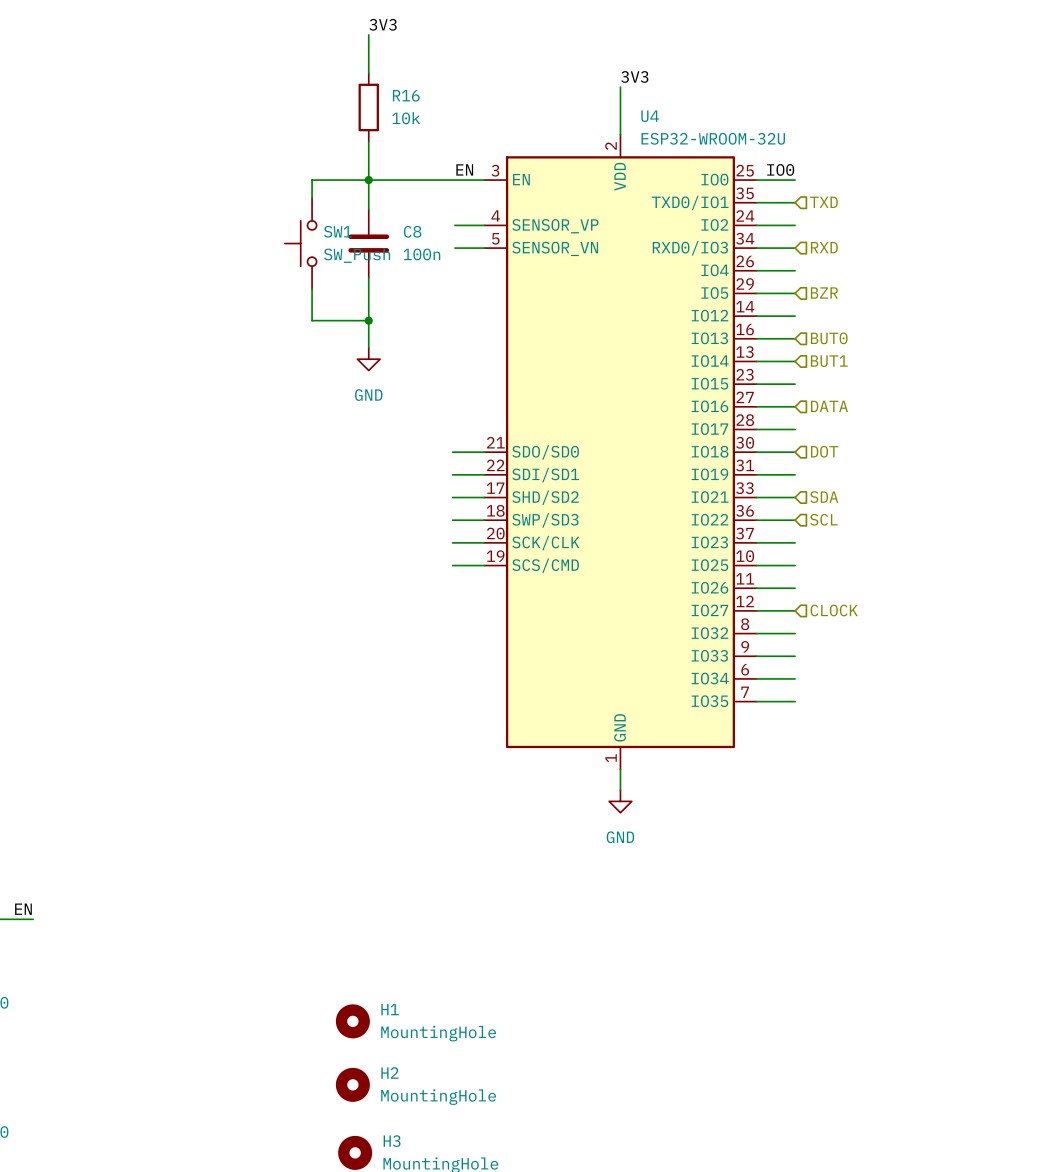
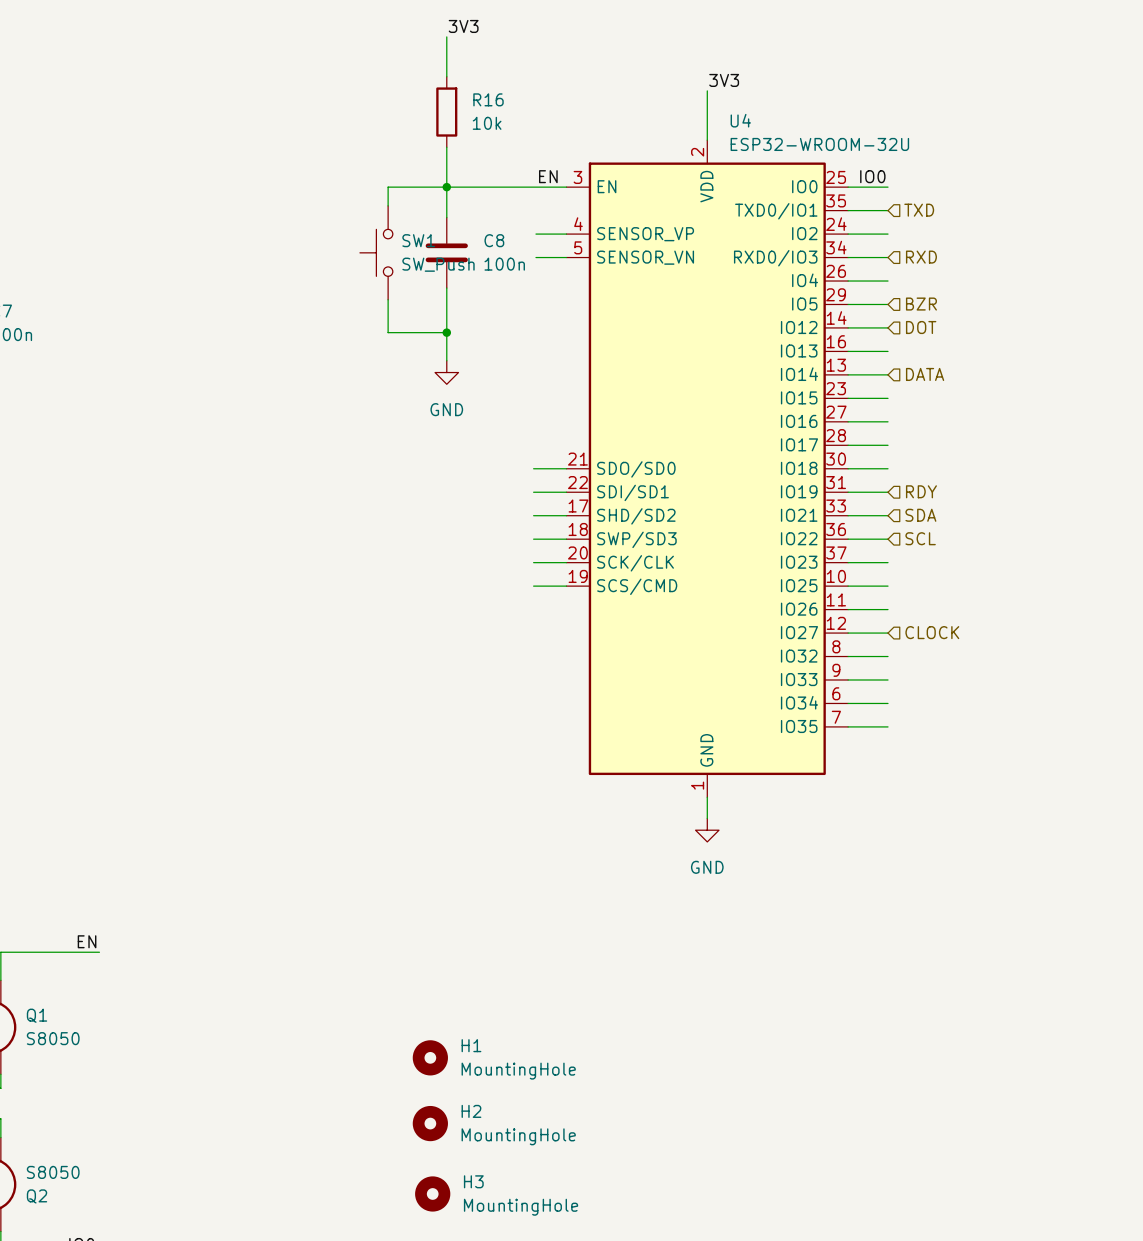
hierarchical label: BUT0 (829, 338) -> none
hierarchical label: BUT1 (829, 361) -> DATA (925, 374)
hierarchical label: DATA (829, 406) -> none
hierarchical label position: DOT (824, 451) -> DOT (921, 327)
hierarchical label: none -> RDY (921, 491)

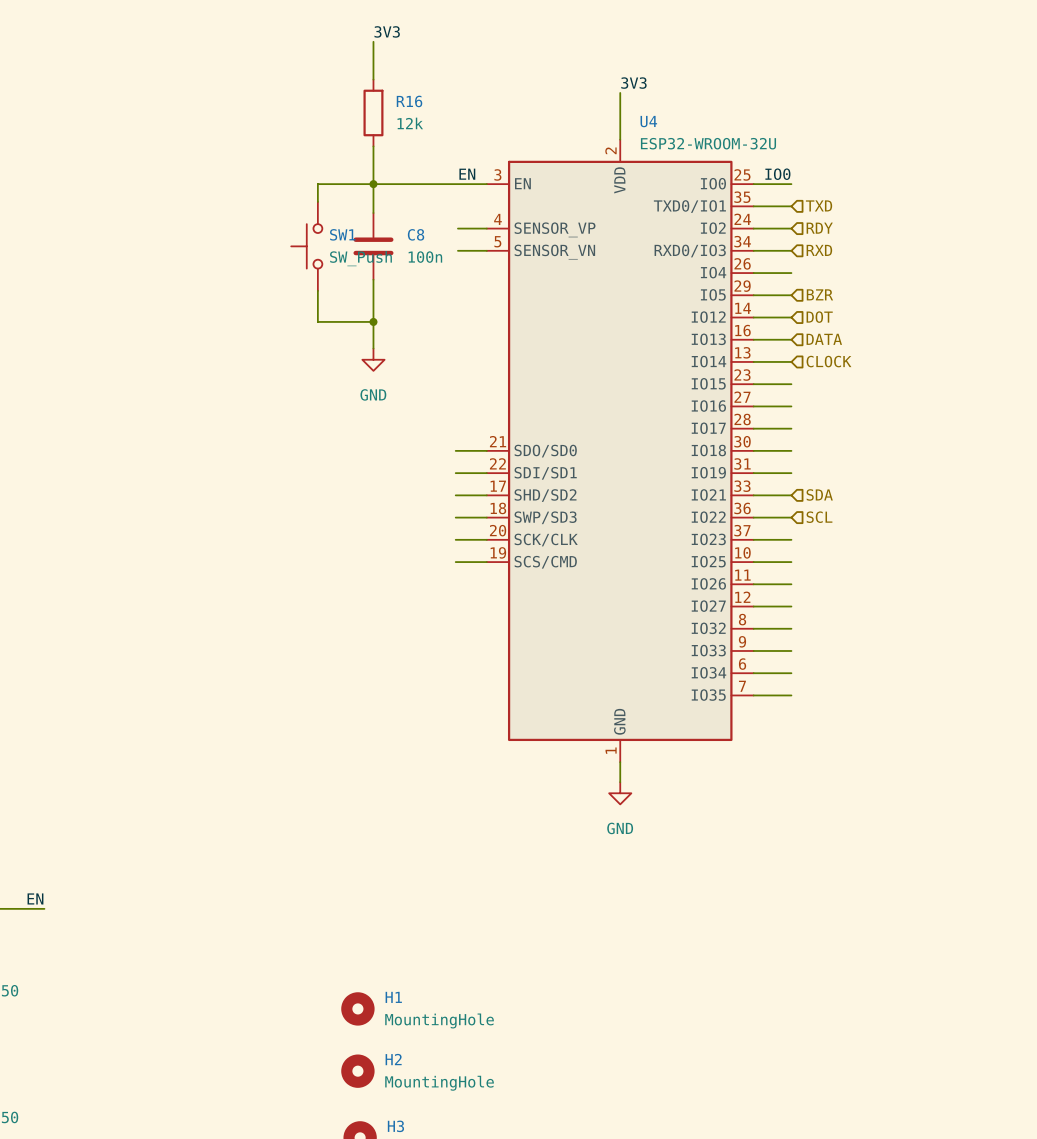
R16 value: 10k (487, 123) -> 12k (410, 123)
hierarchical label: none -> RDY (819, 228)
hierarchical label: none -> DATA (824, 339)
hierarchical label: DATA (925, 374) -> CLOCK (828, 361)
hierarchical label: RDY (921, 491) -> none
hierarchical label: CLOCK (932, 632) -> none

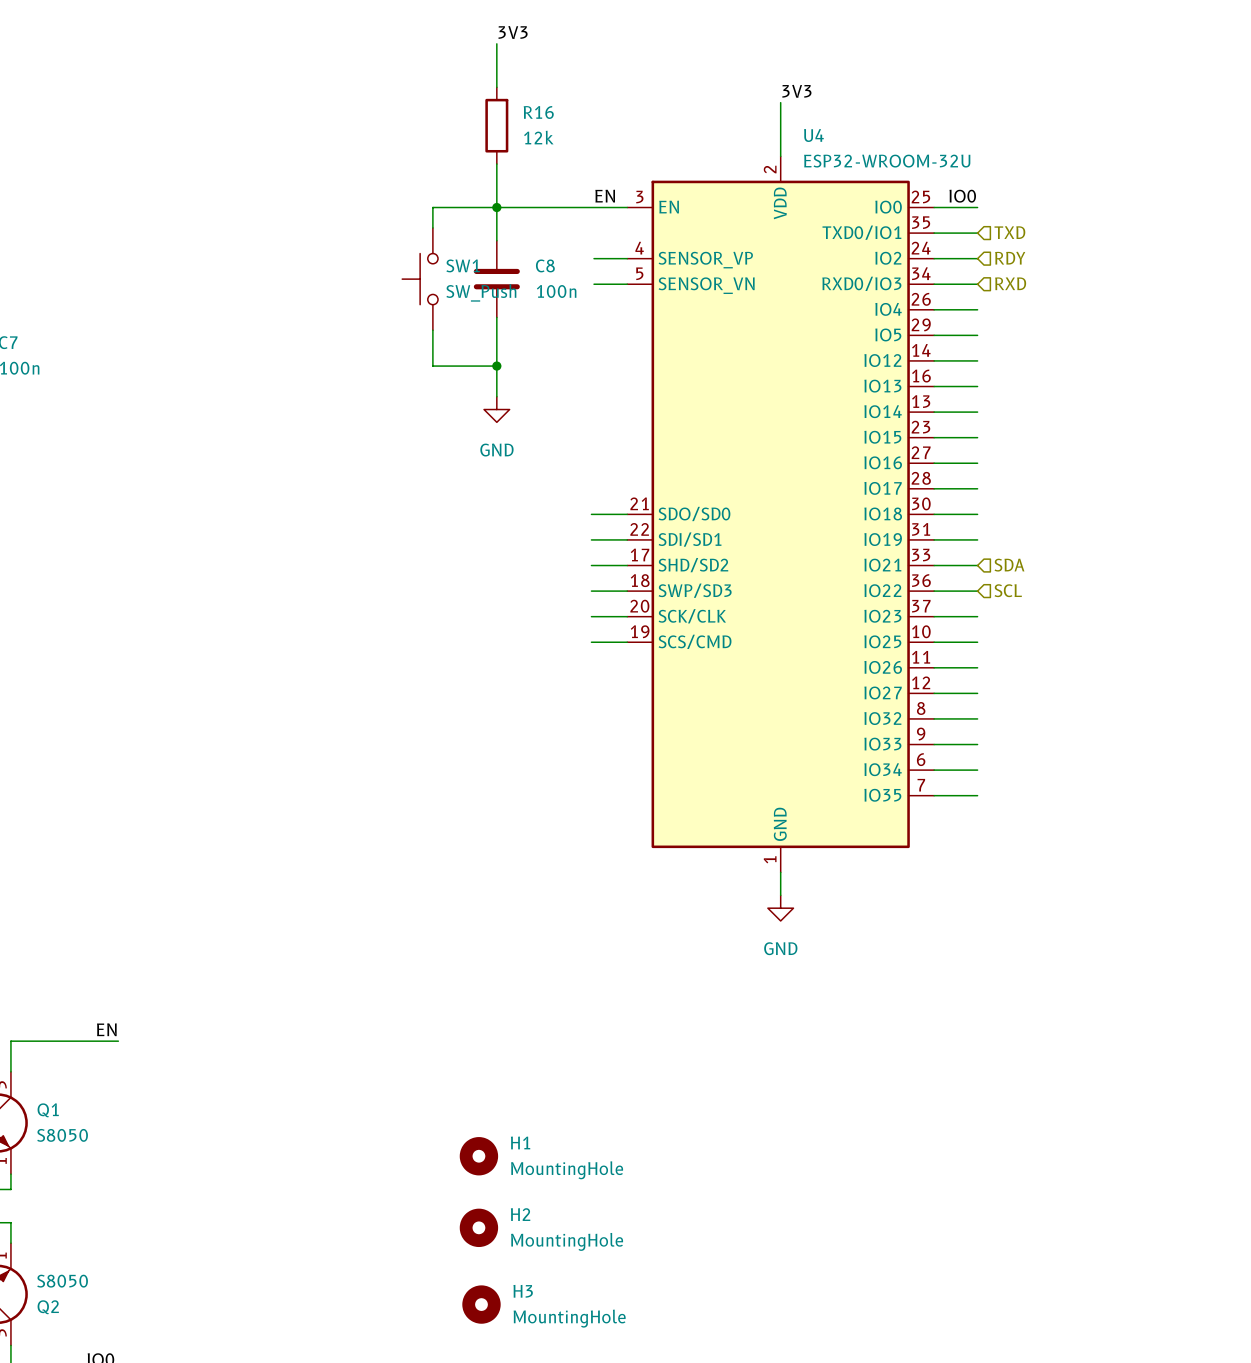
hierarchical label: BZR (819, 294) -> none
hierarchical label: DOT (819, 317) -> none
hierarchical label: DATA (824, 339) -> none
hierarchical label: CLOCK (828, 361) -> none

